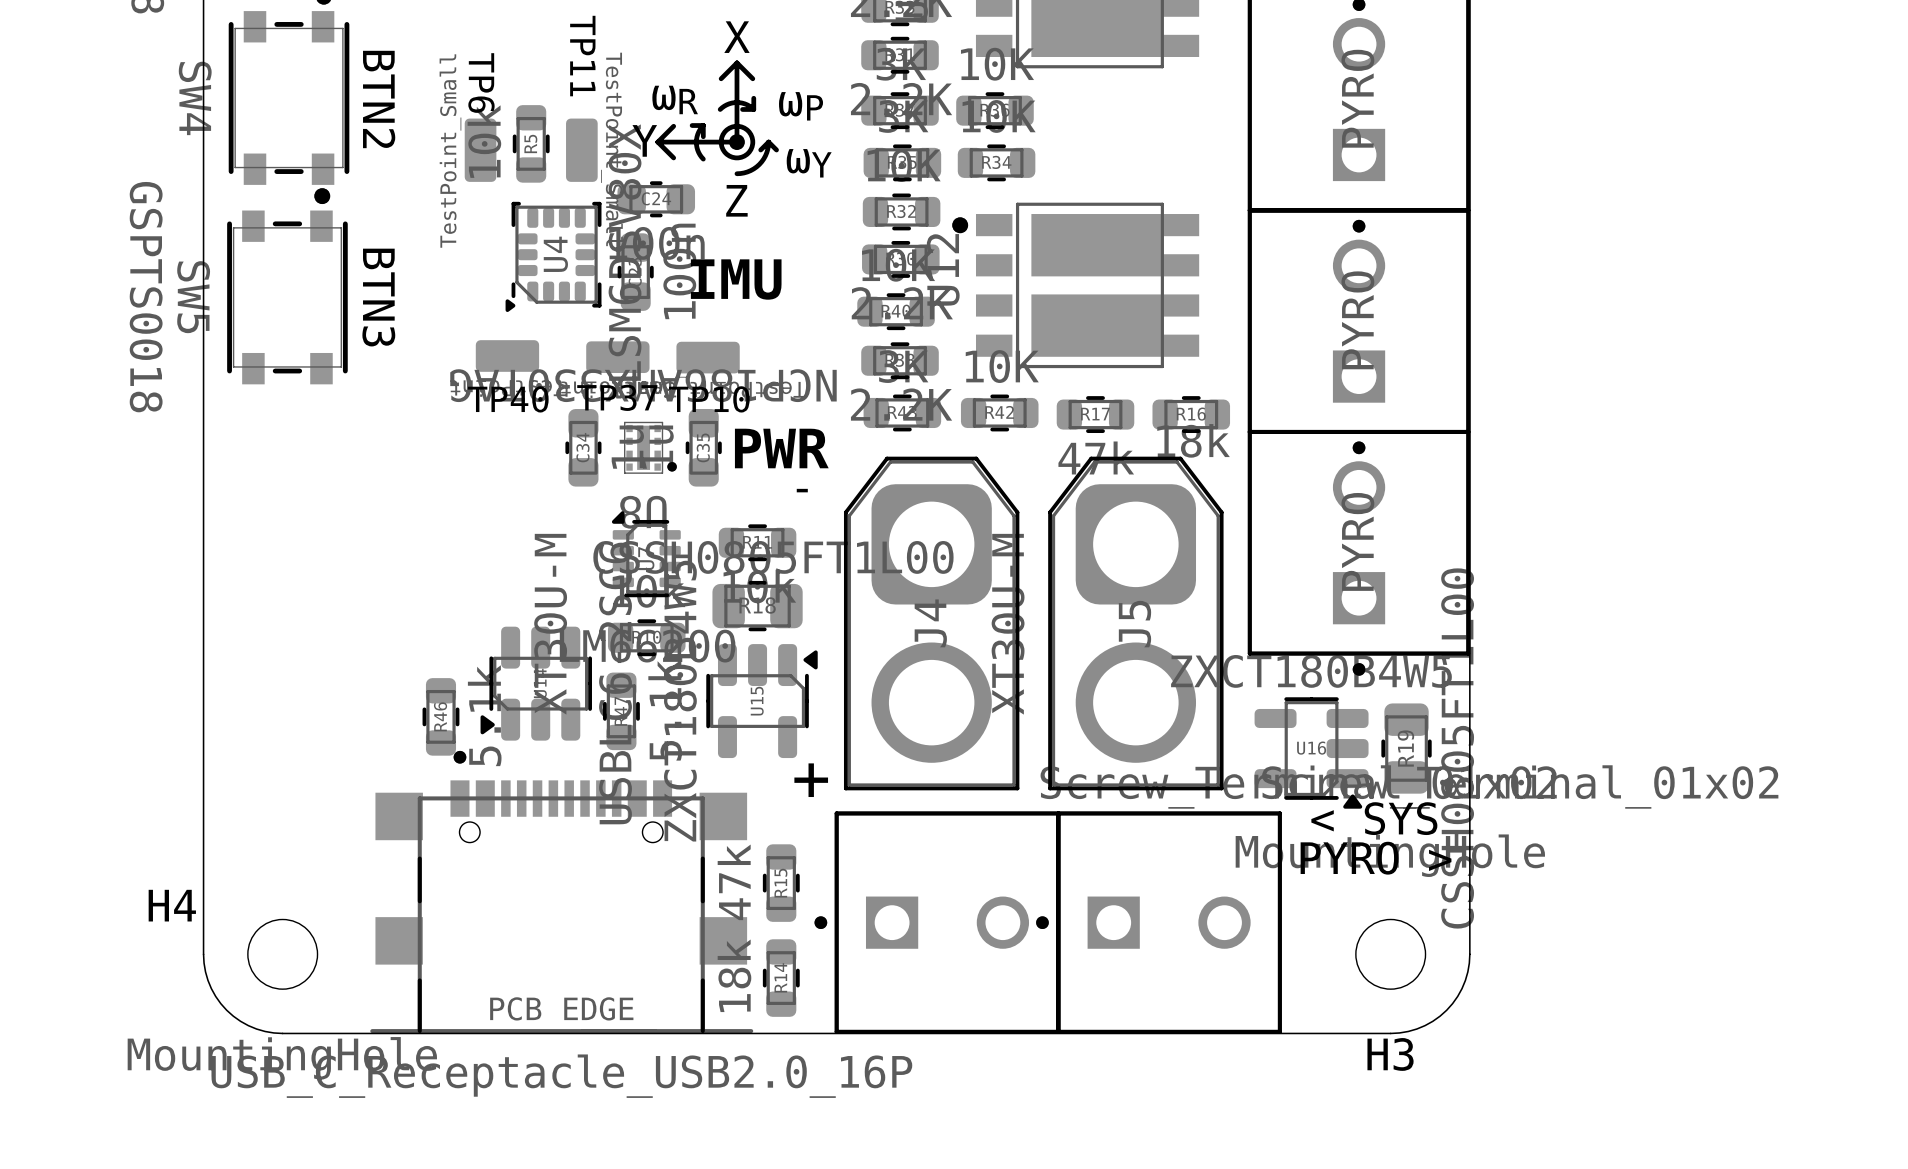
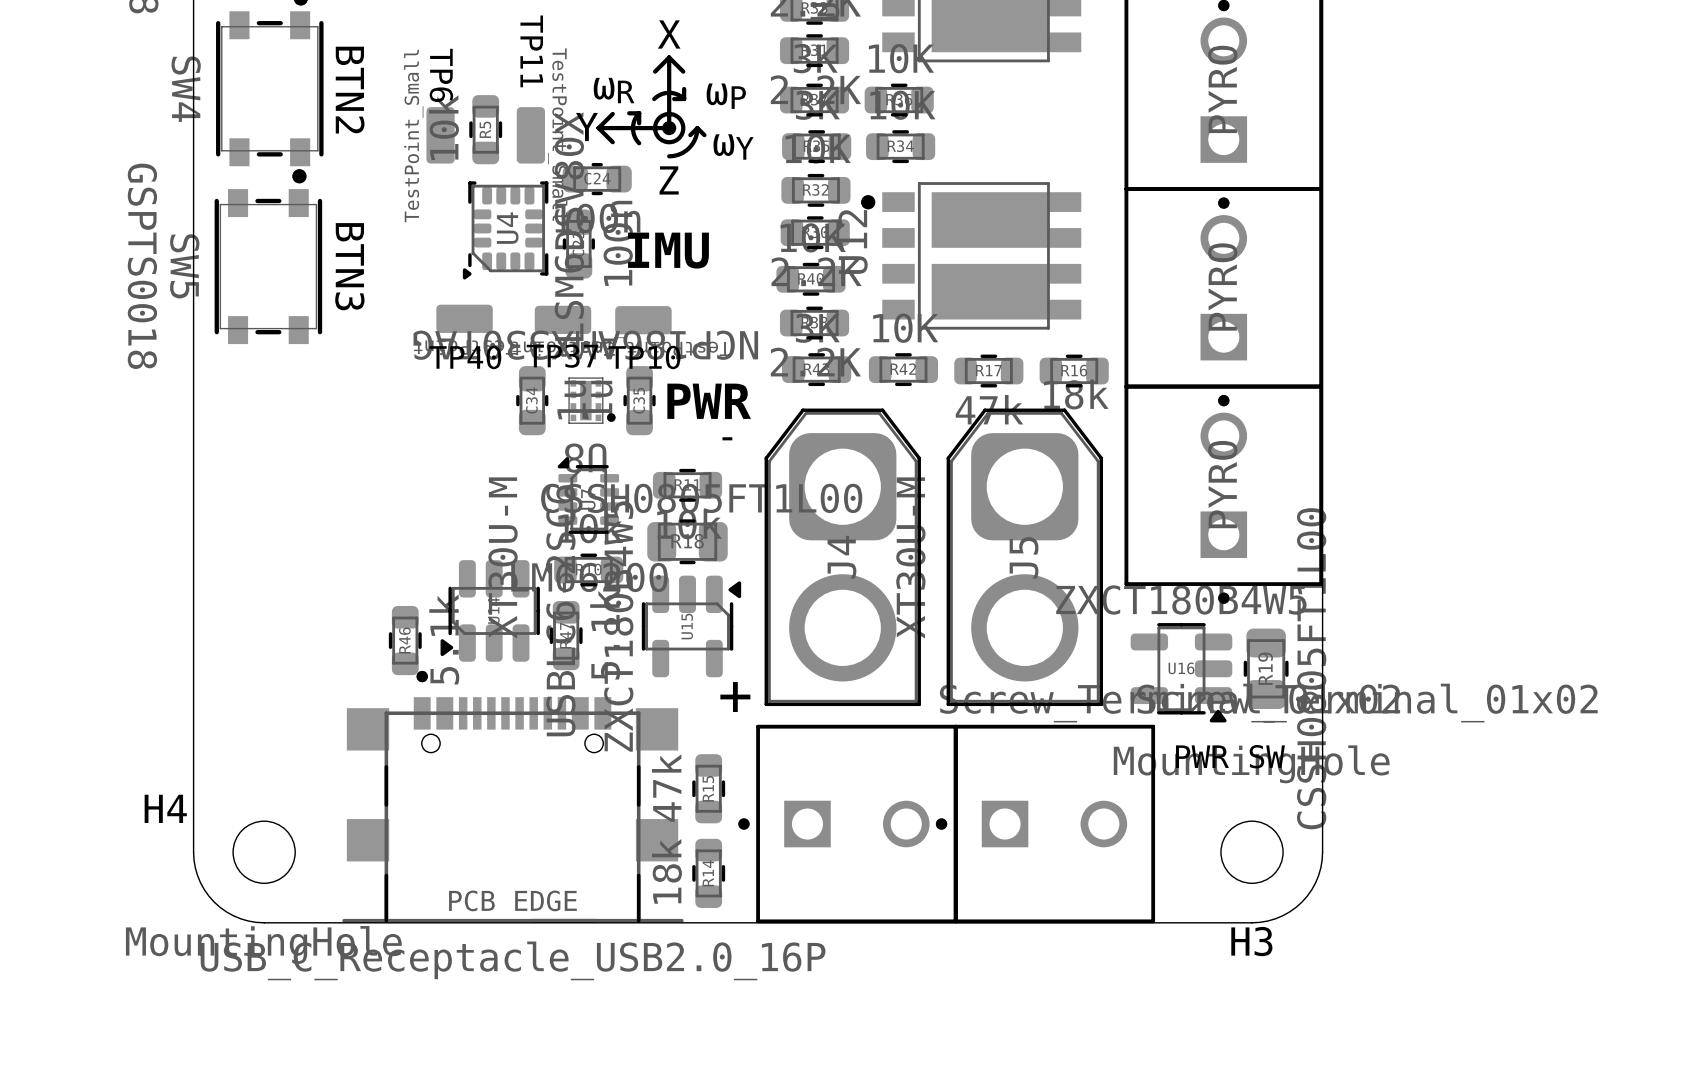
text: < SYS (1374, 818) -> none
text: none -> PWR SW (1230, 756)
text: PYRO > (1376, 858) -> none

